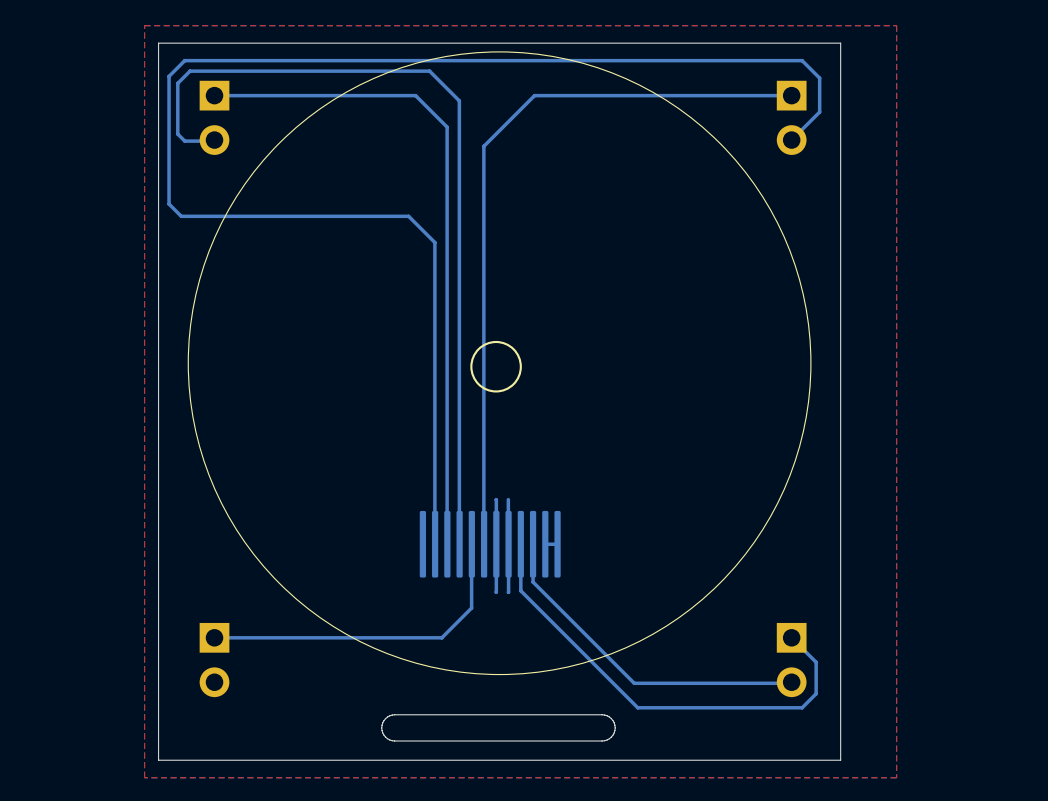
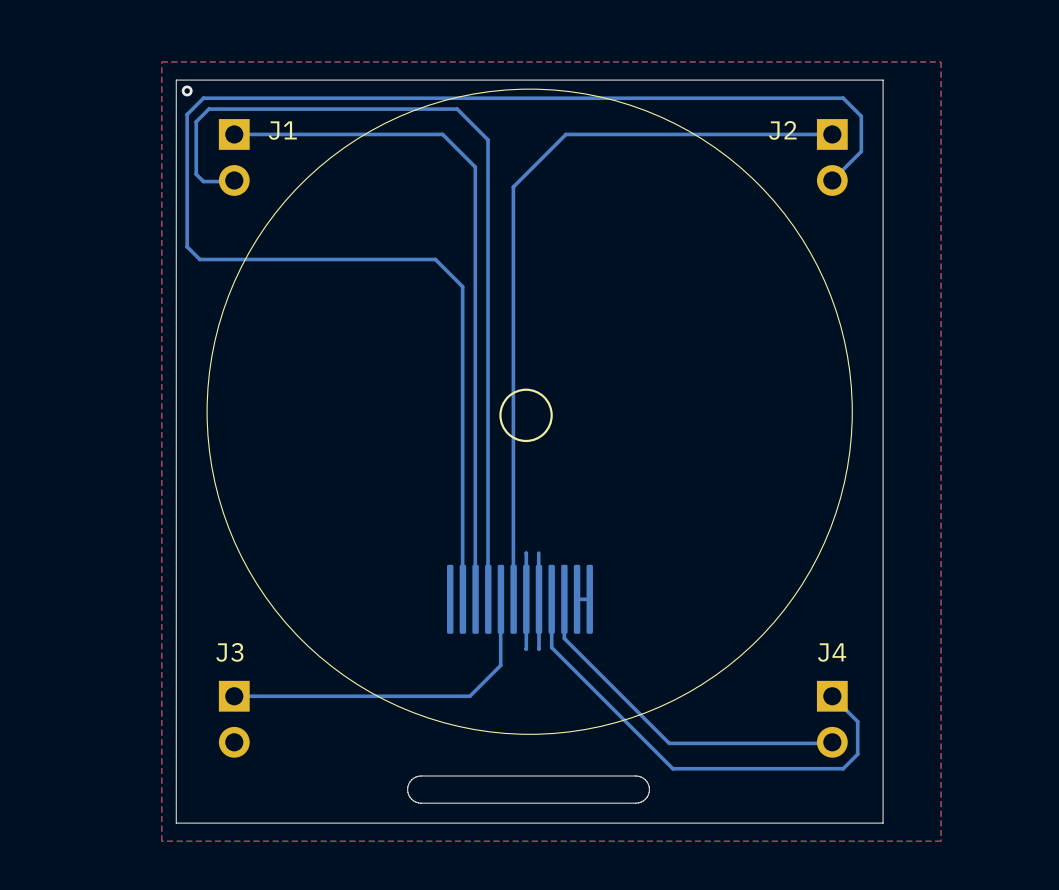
via: none -> (187, 90)
text: none -> J1 (282, 130)
text: none -> J2 (782, 130)
text: none -> J3 (229, 652)
text: none -> J4 (832, 652)

